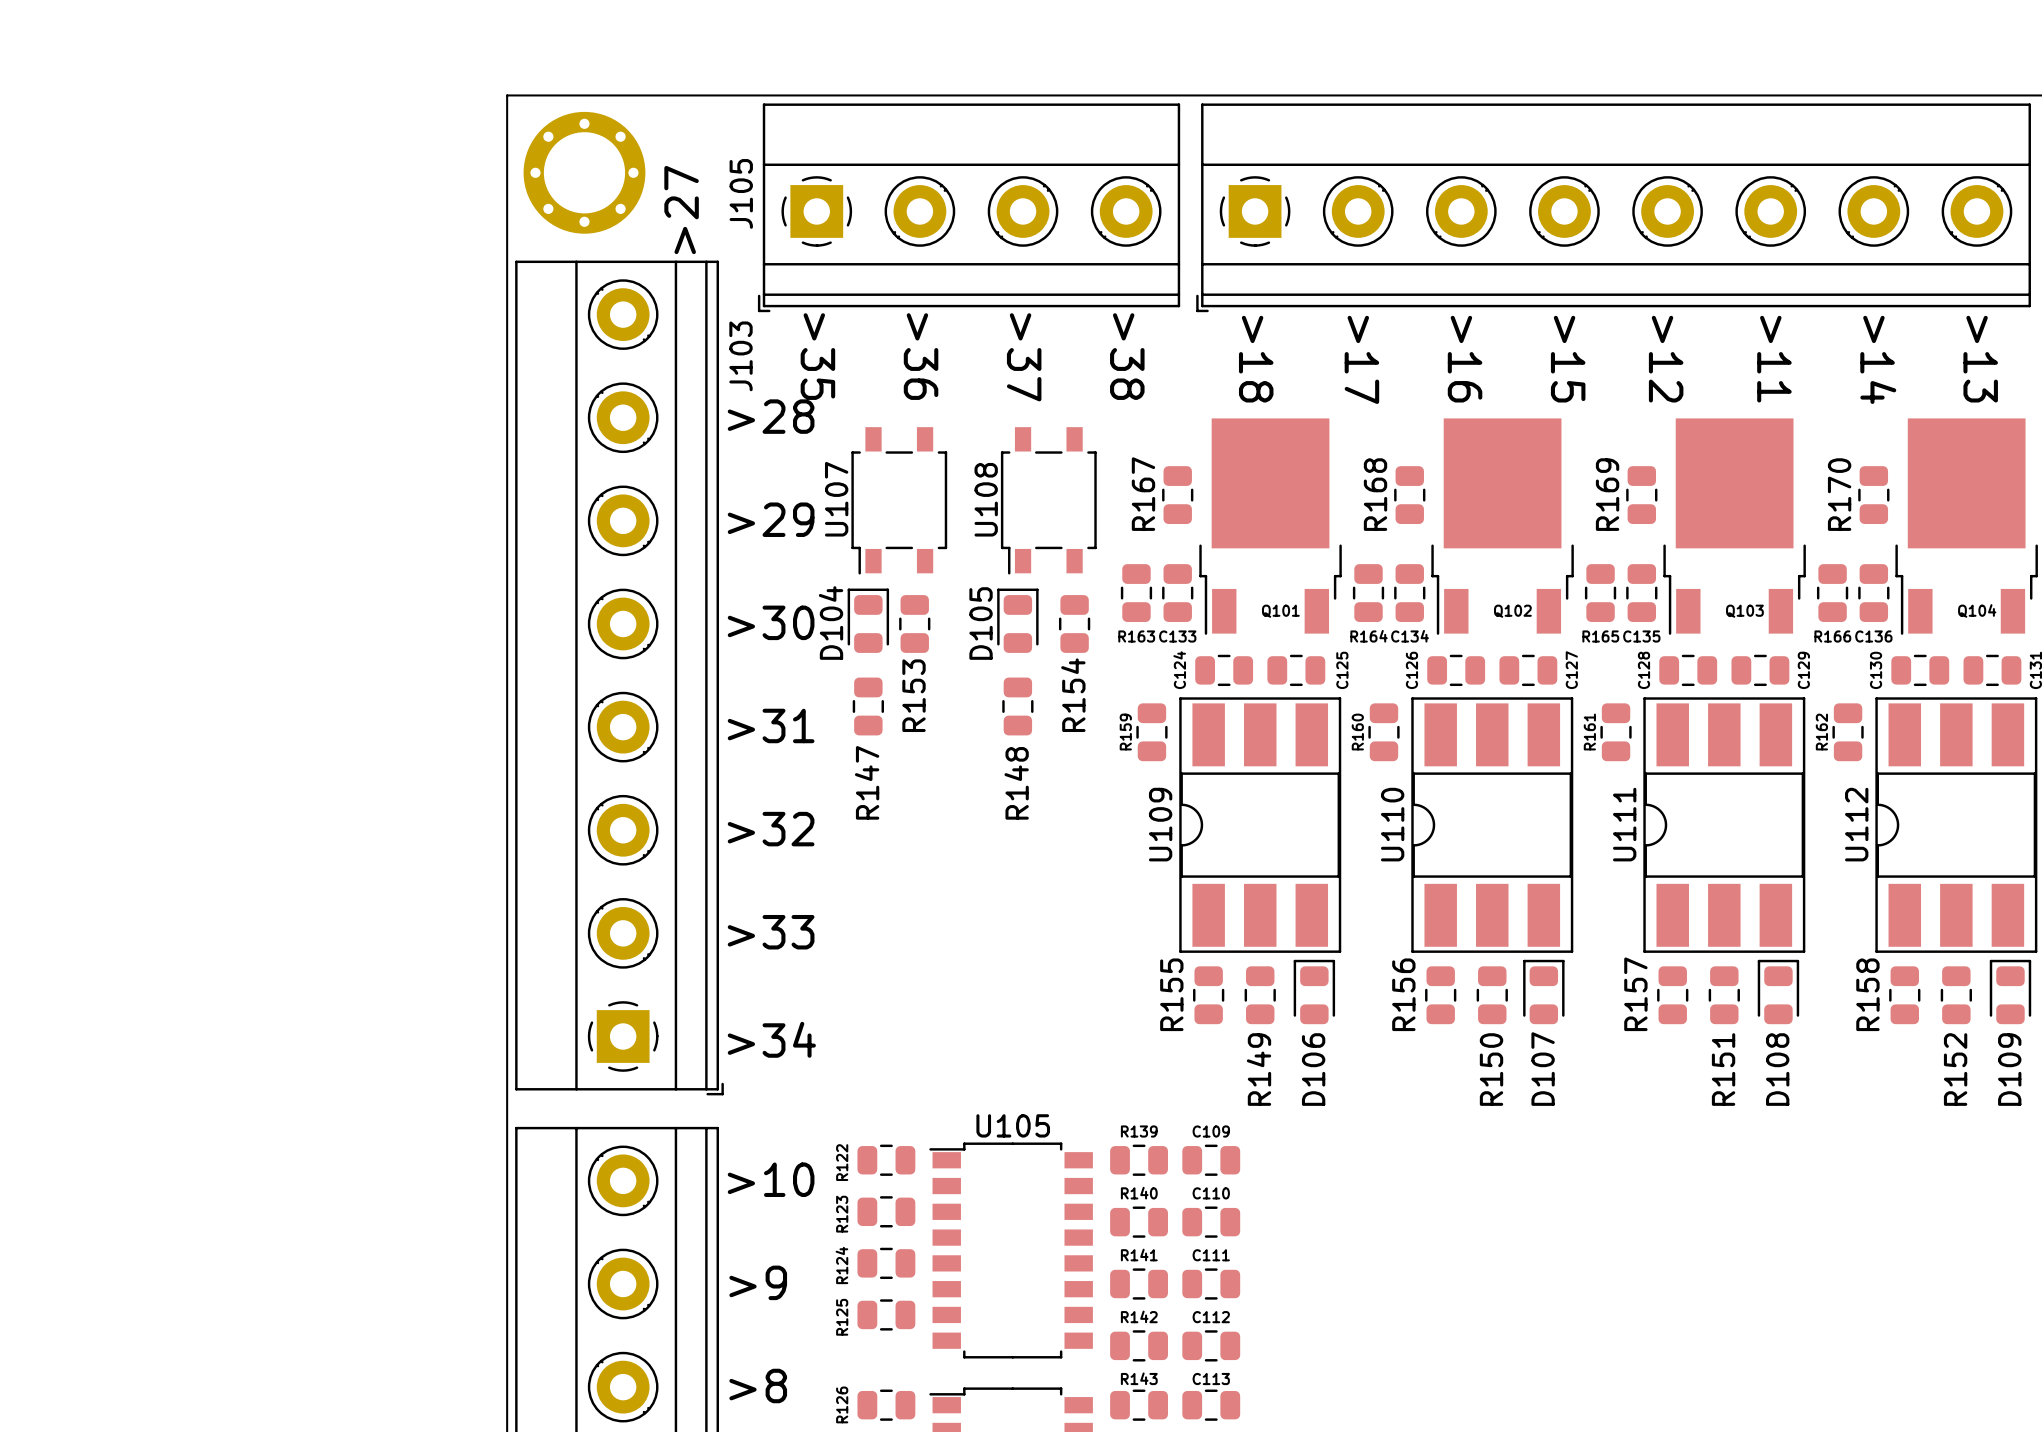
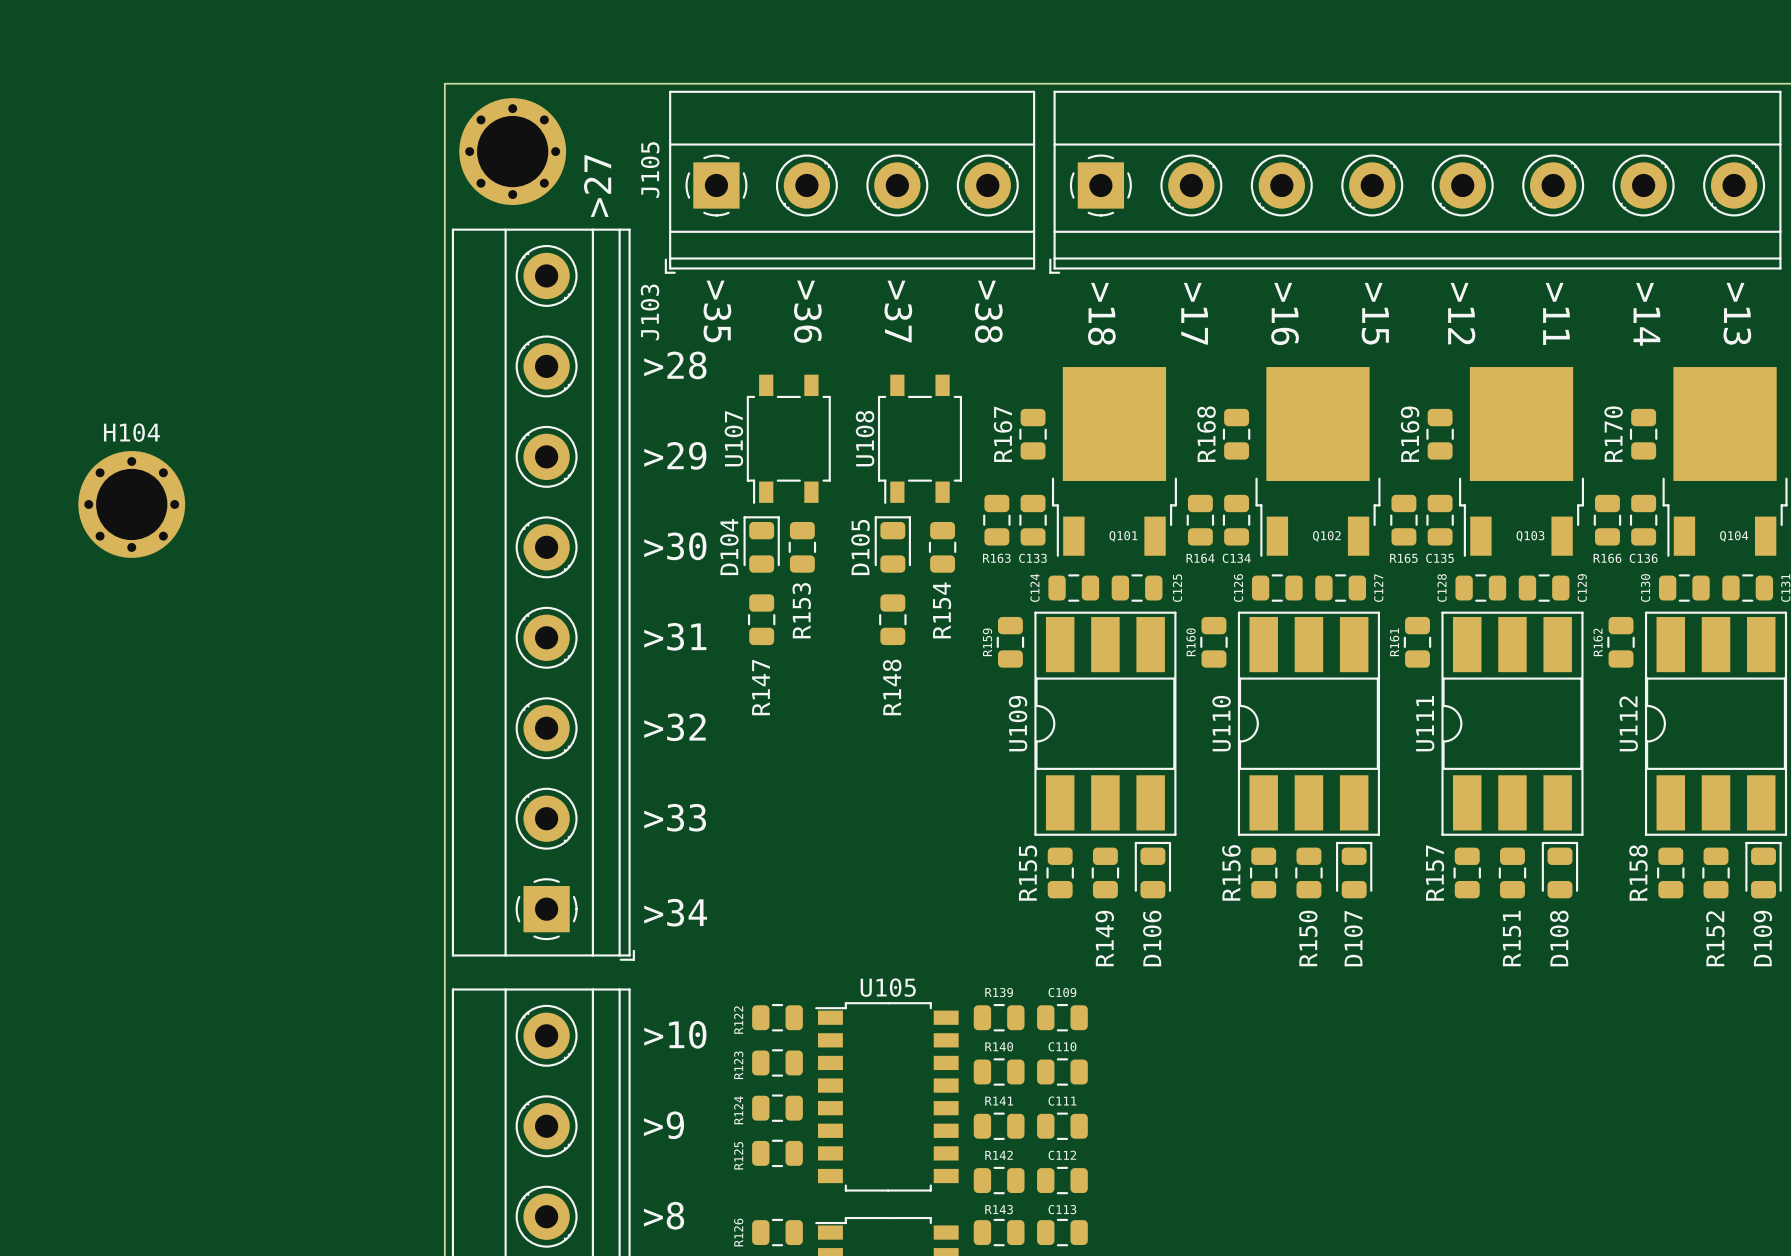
H104: none -> (131, 504)

